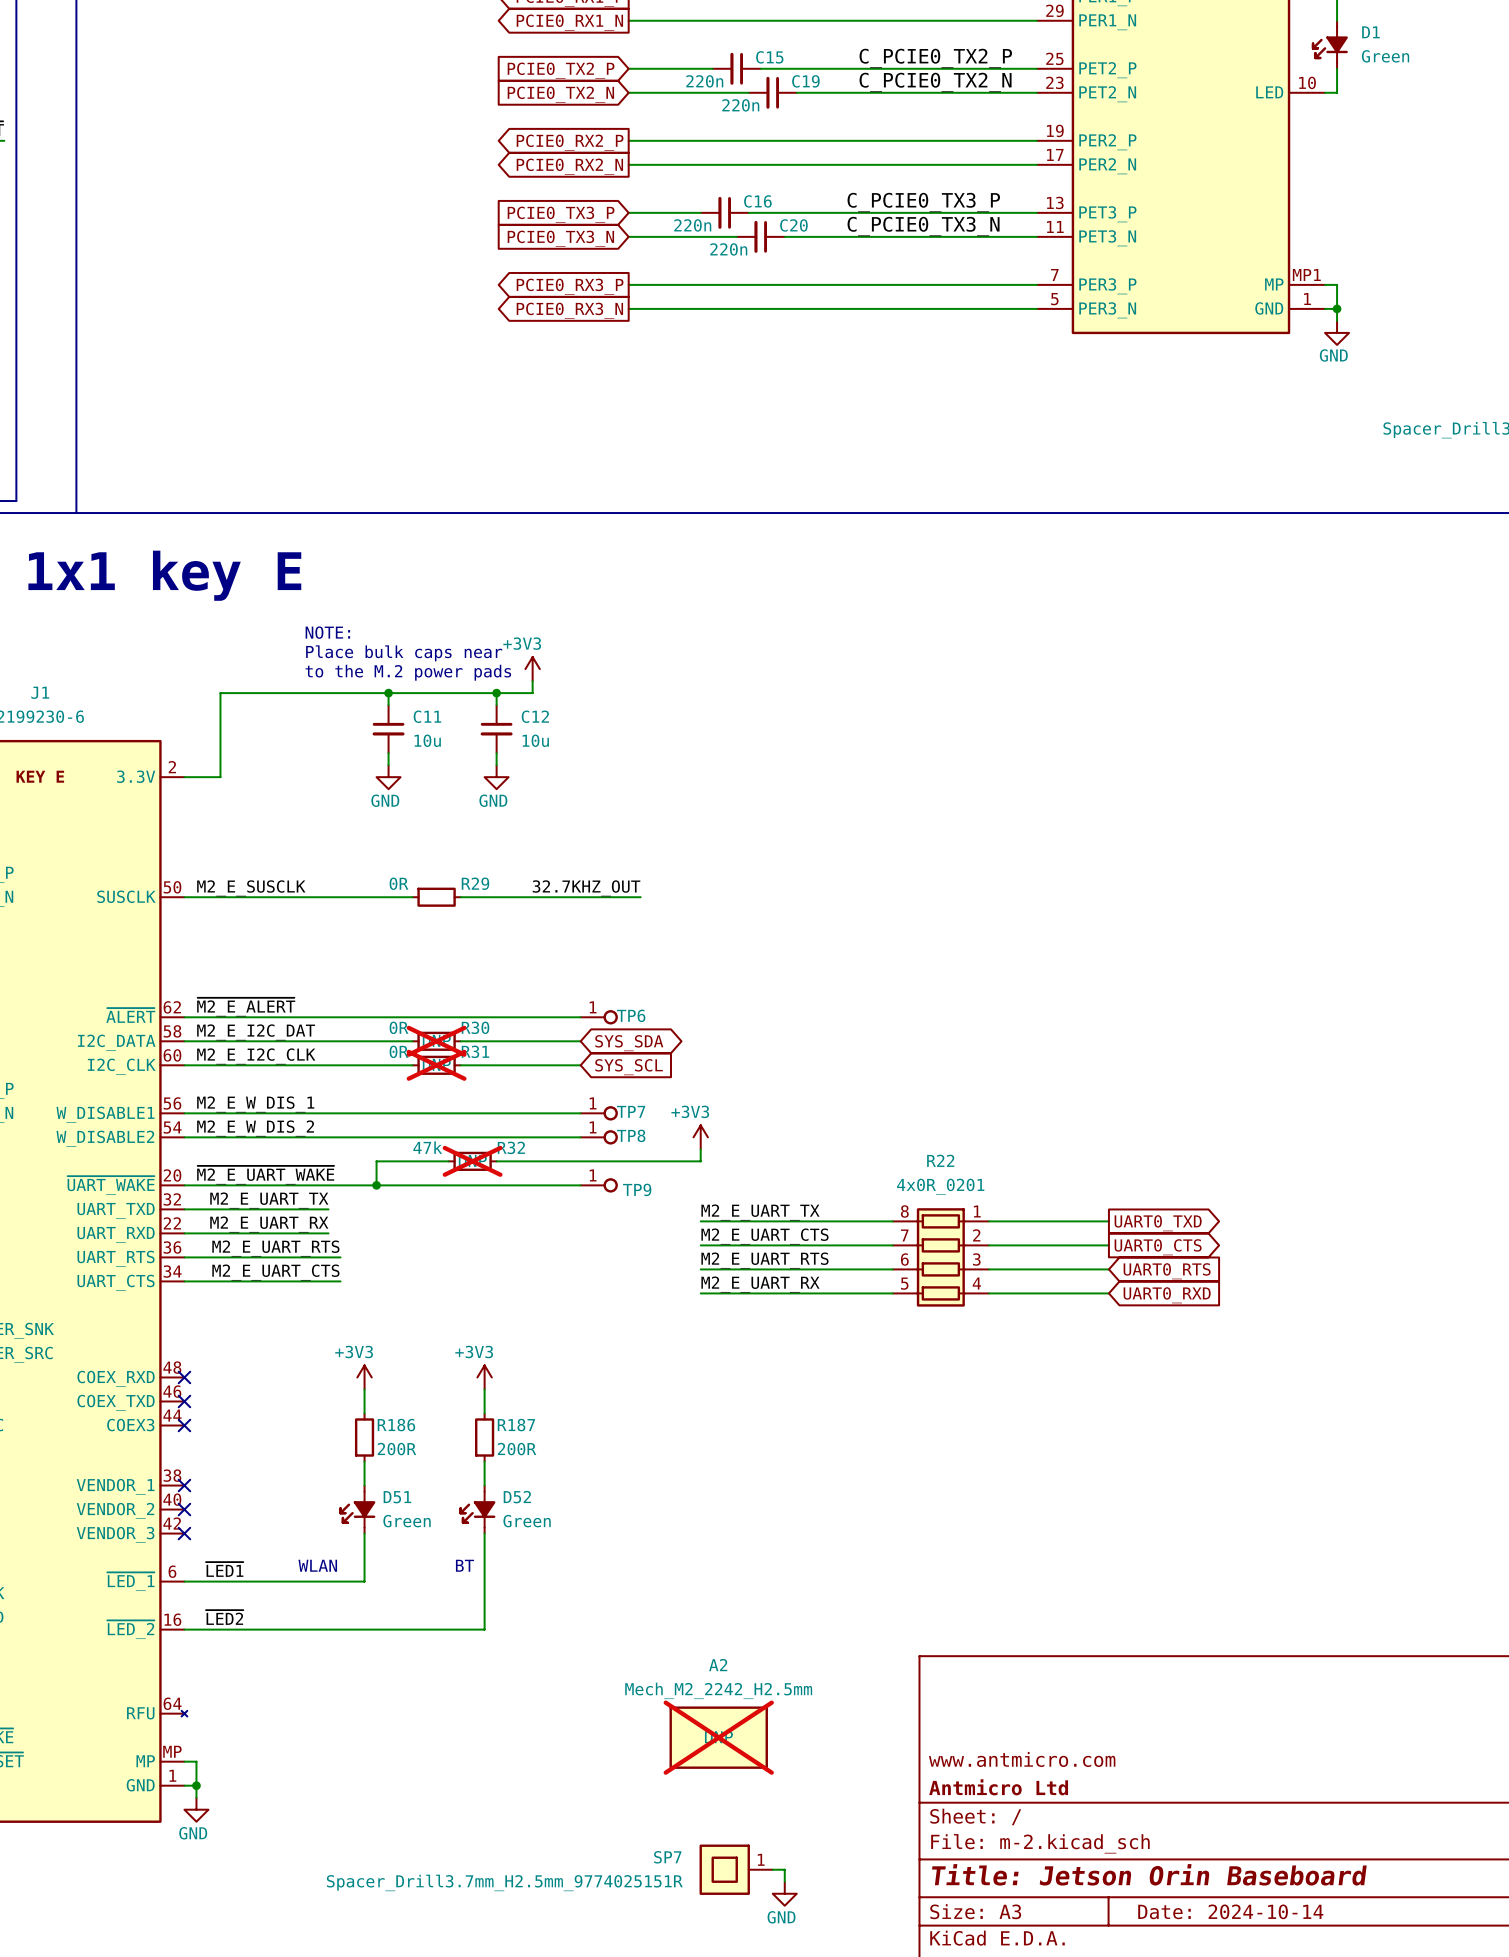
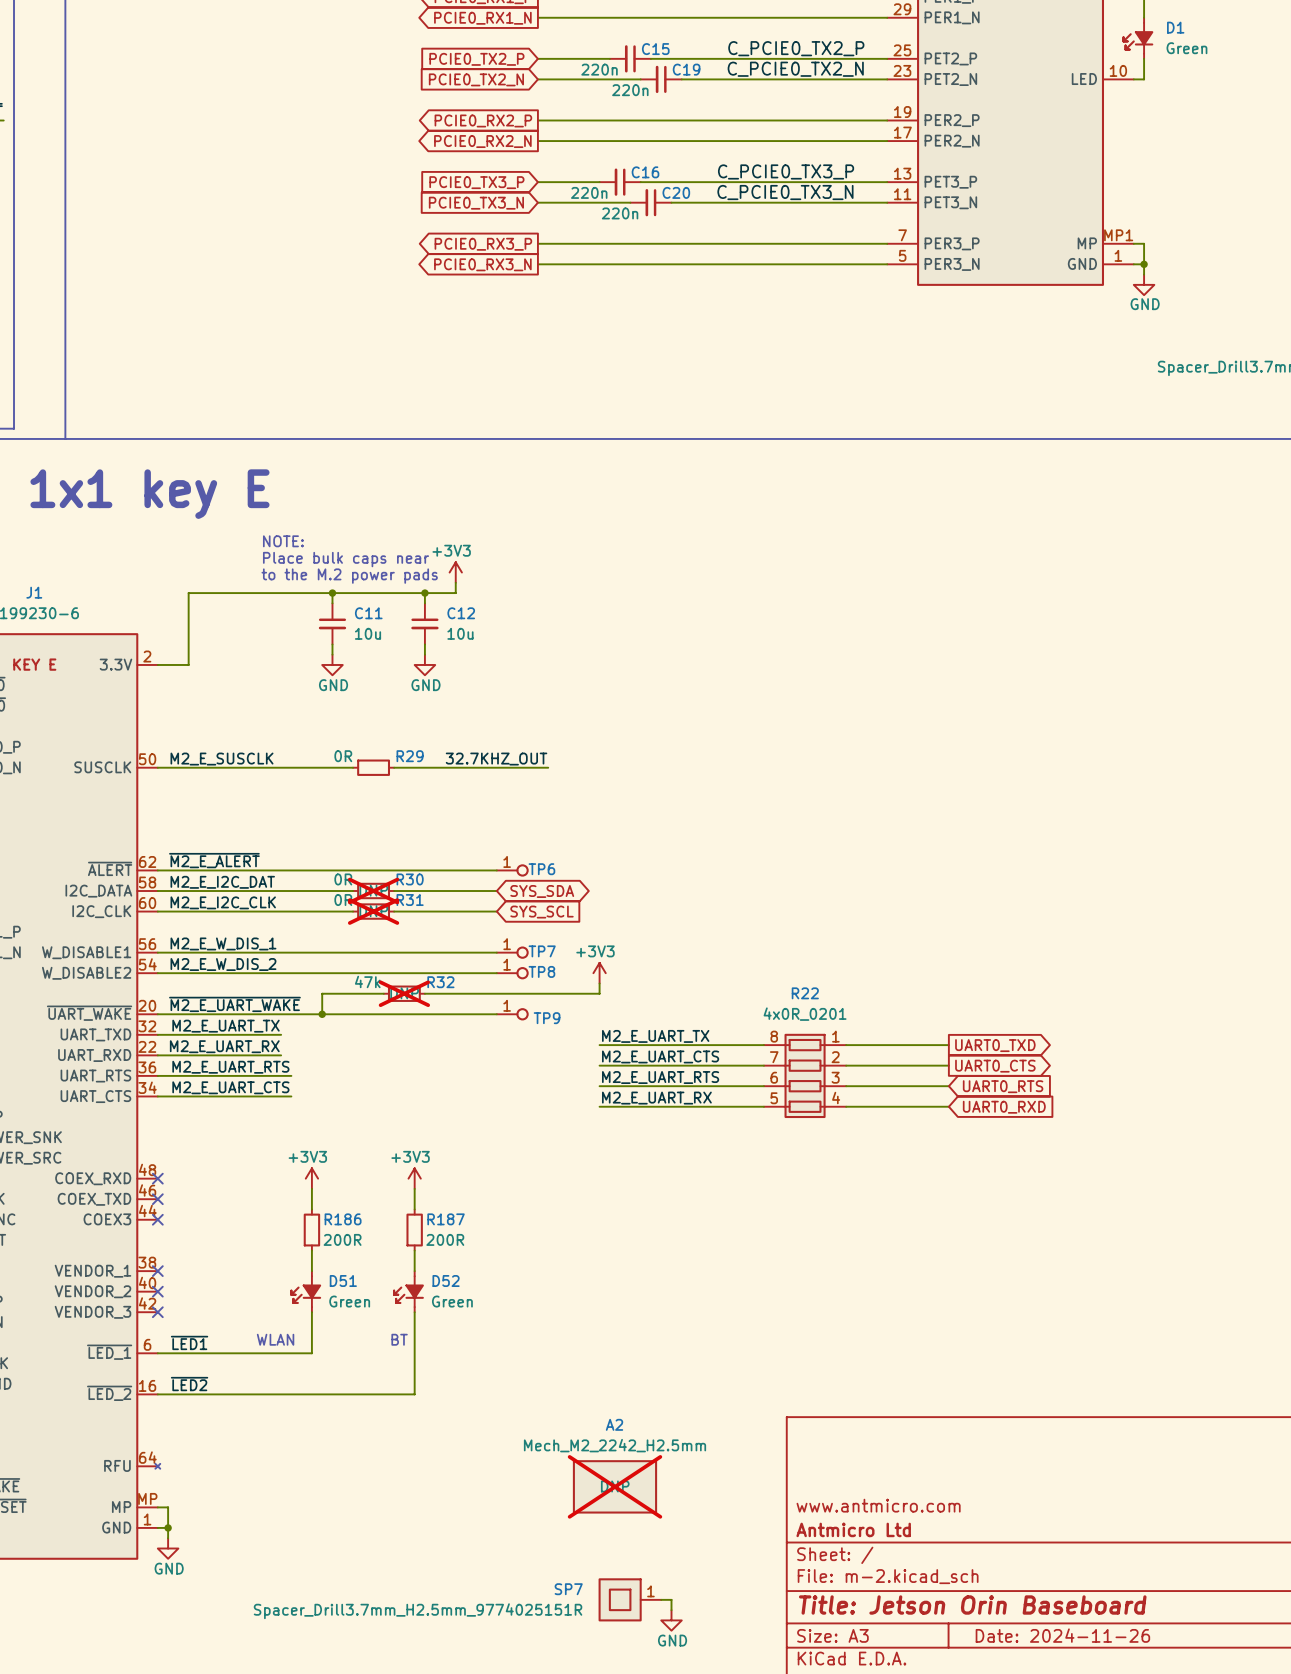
title block: Date: 2024-10-14 (1230, 1911) -> Date: 2024-11-26 (1062, 1635)

